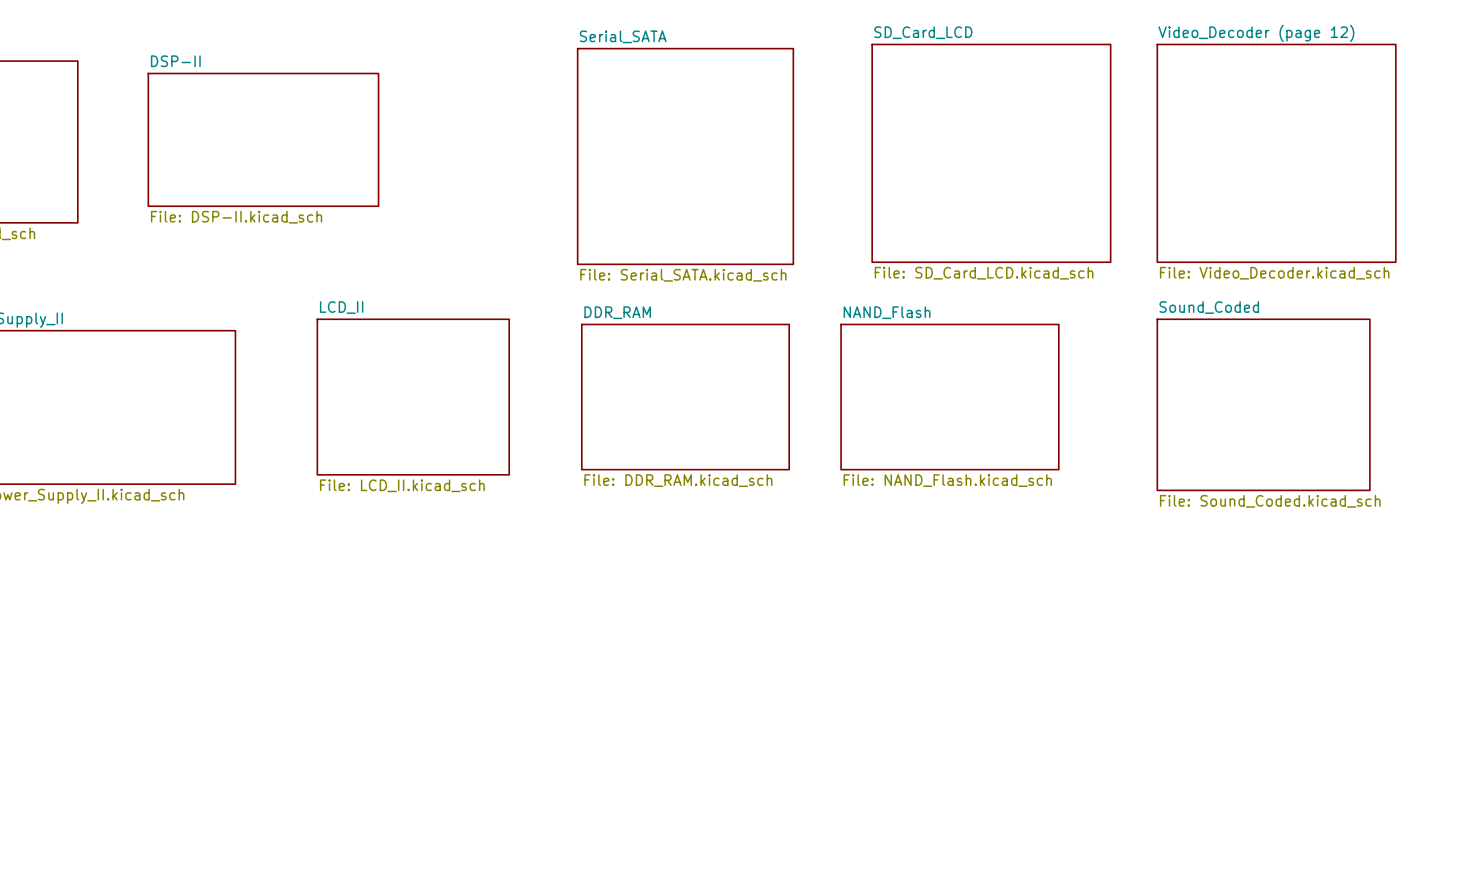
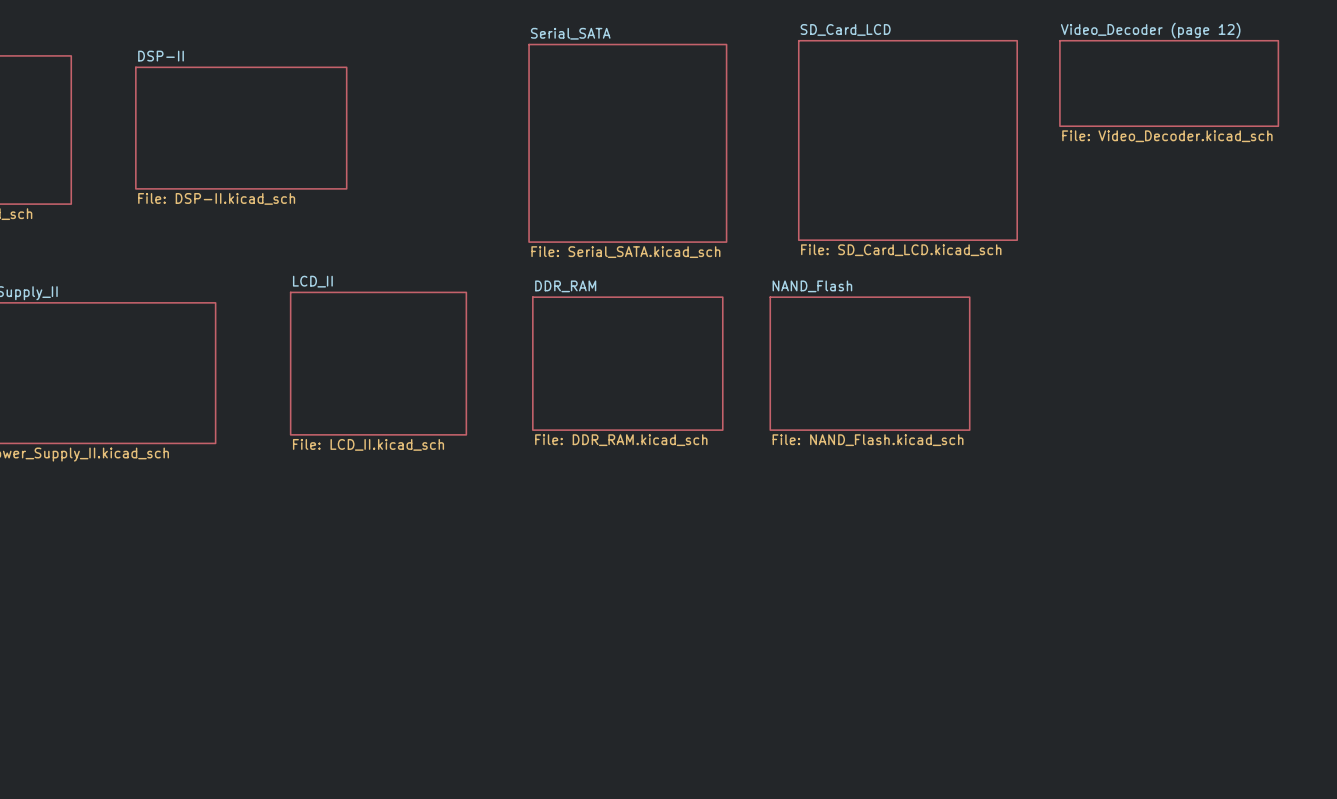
sheet Video_Decoder (page 12) shape: [1156, 43, 1397, 263] -> [1059, 40, 1279, 127]
sheet Video_Decoder (page 12) value position: File: Video_Decoder.kicad_sch (1274, 273) -> File: Video_Decoder.kicad_sch (1167, 136)
sheet Sound_Coded: File: Sound_Coded.kicad_sch (1263, 404) -> none

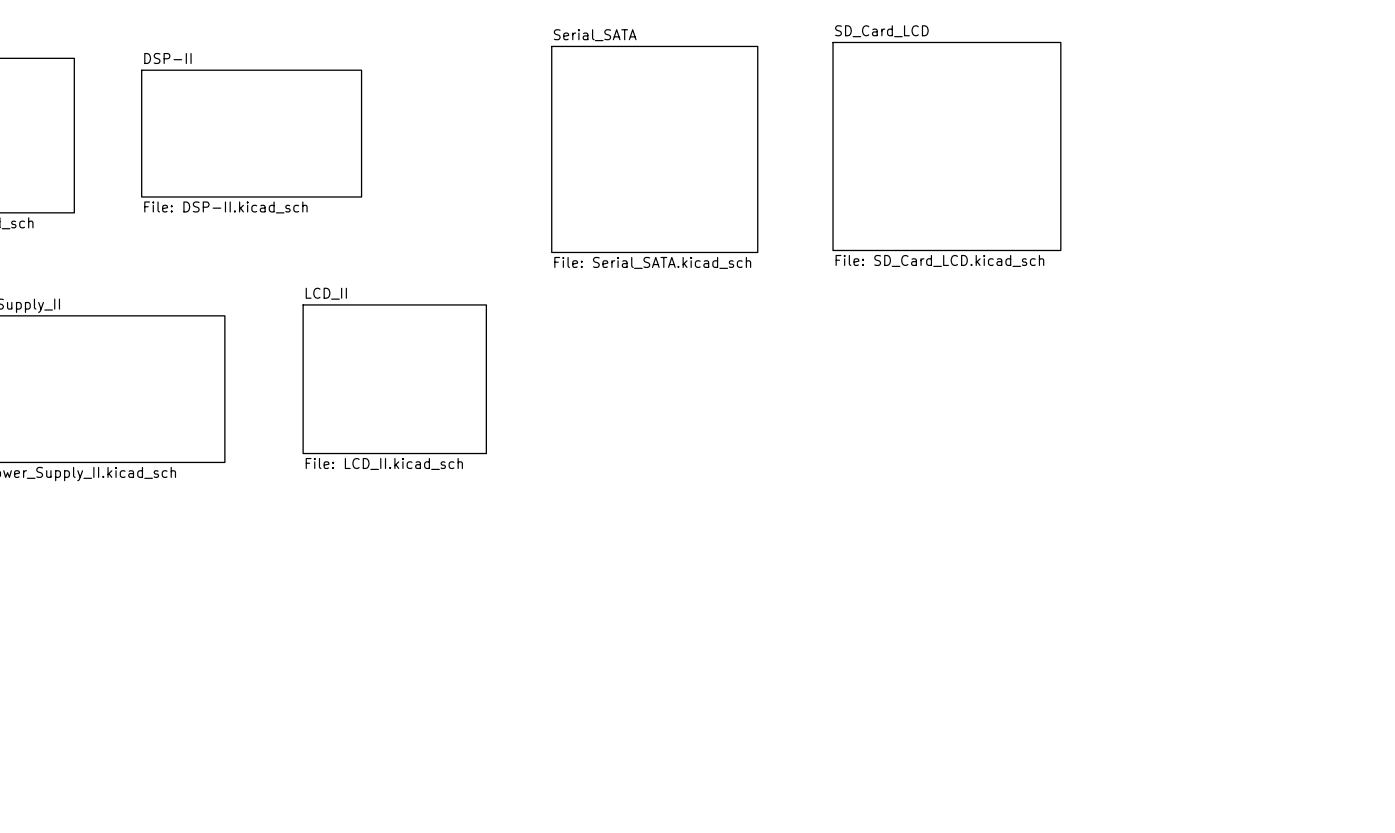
sheet Video_Decoder (page 12): File: Video_Decoder.kicad_sch (1169, 83) -> none
sheet DDR_RAM: File: DDR_RAM.kicad_sch (627, 363) -> none
sheet NAND_Flash: File: NAND_Flash.kicad_sch (869, 363) -> none

